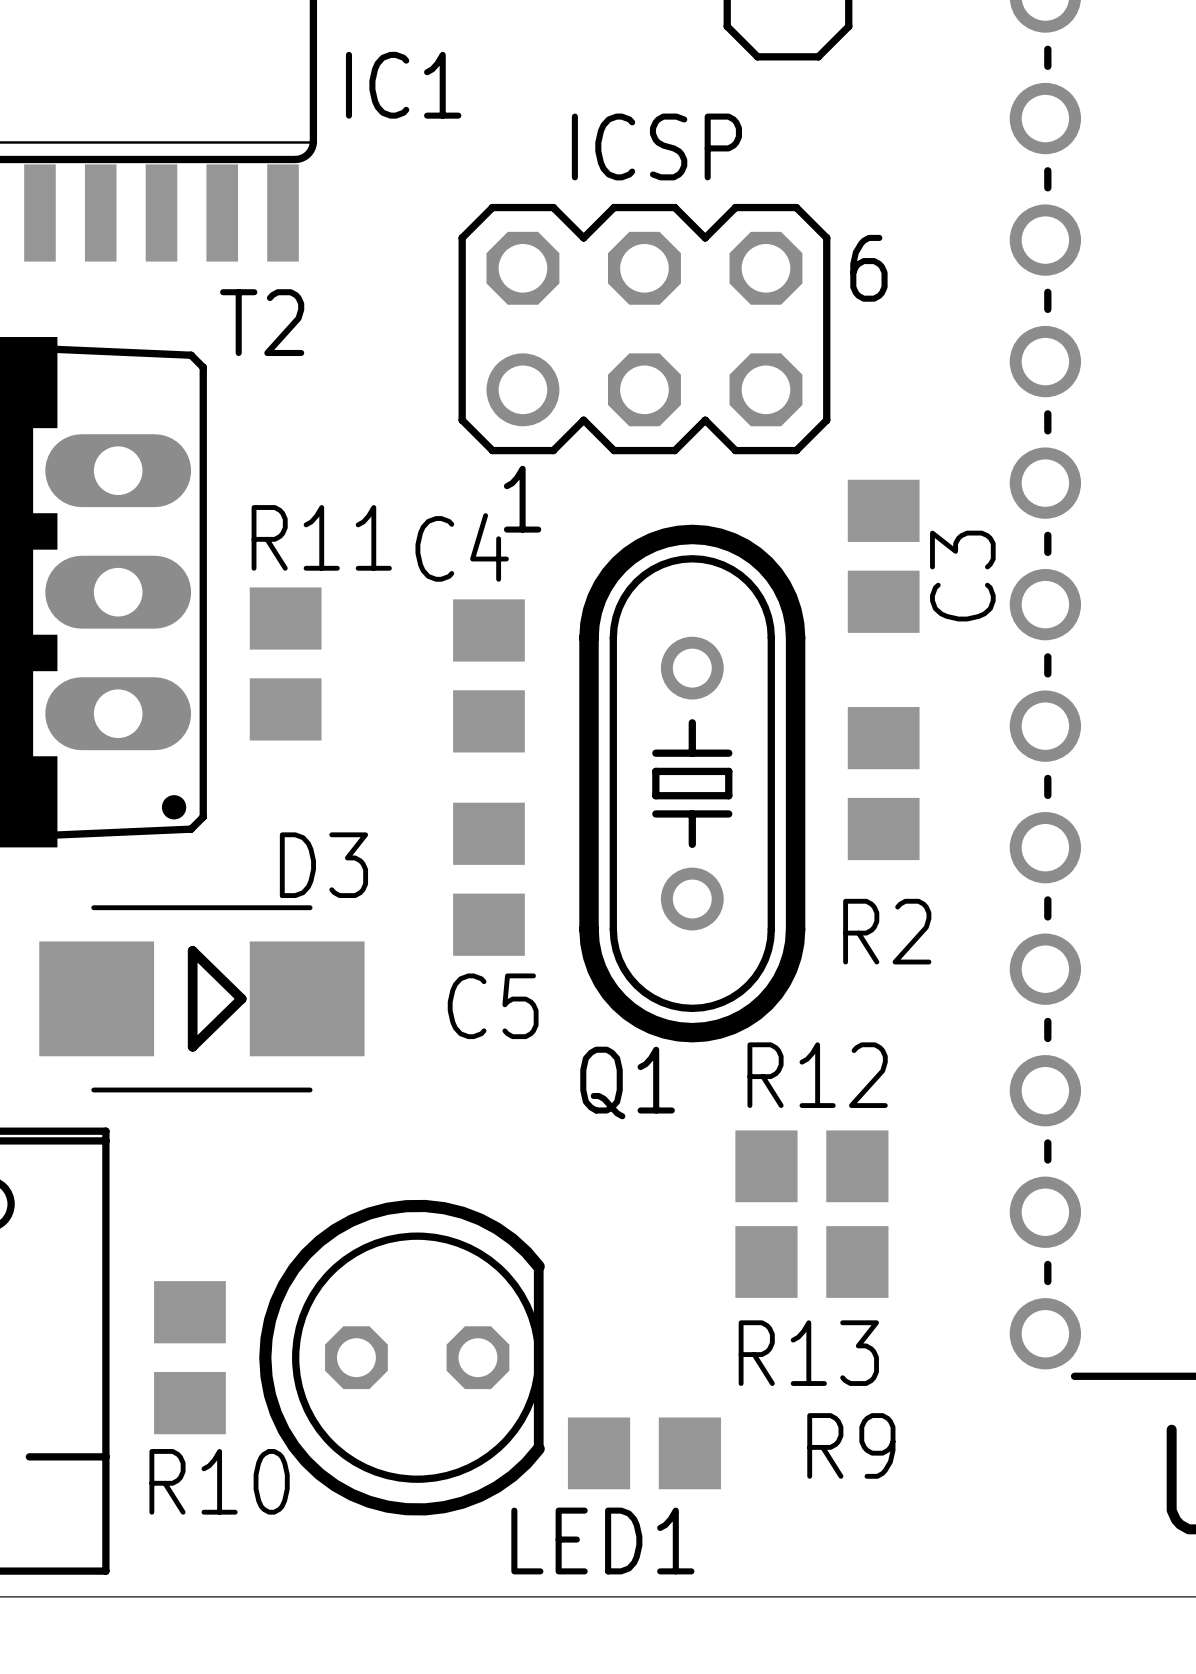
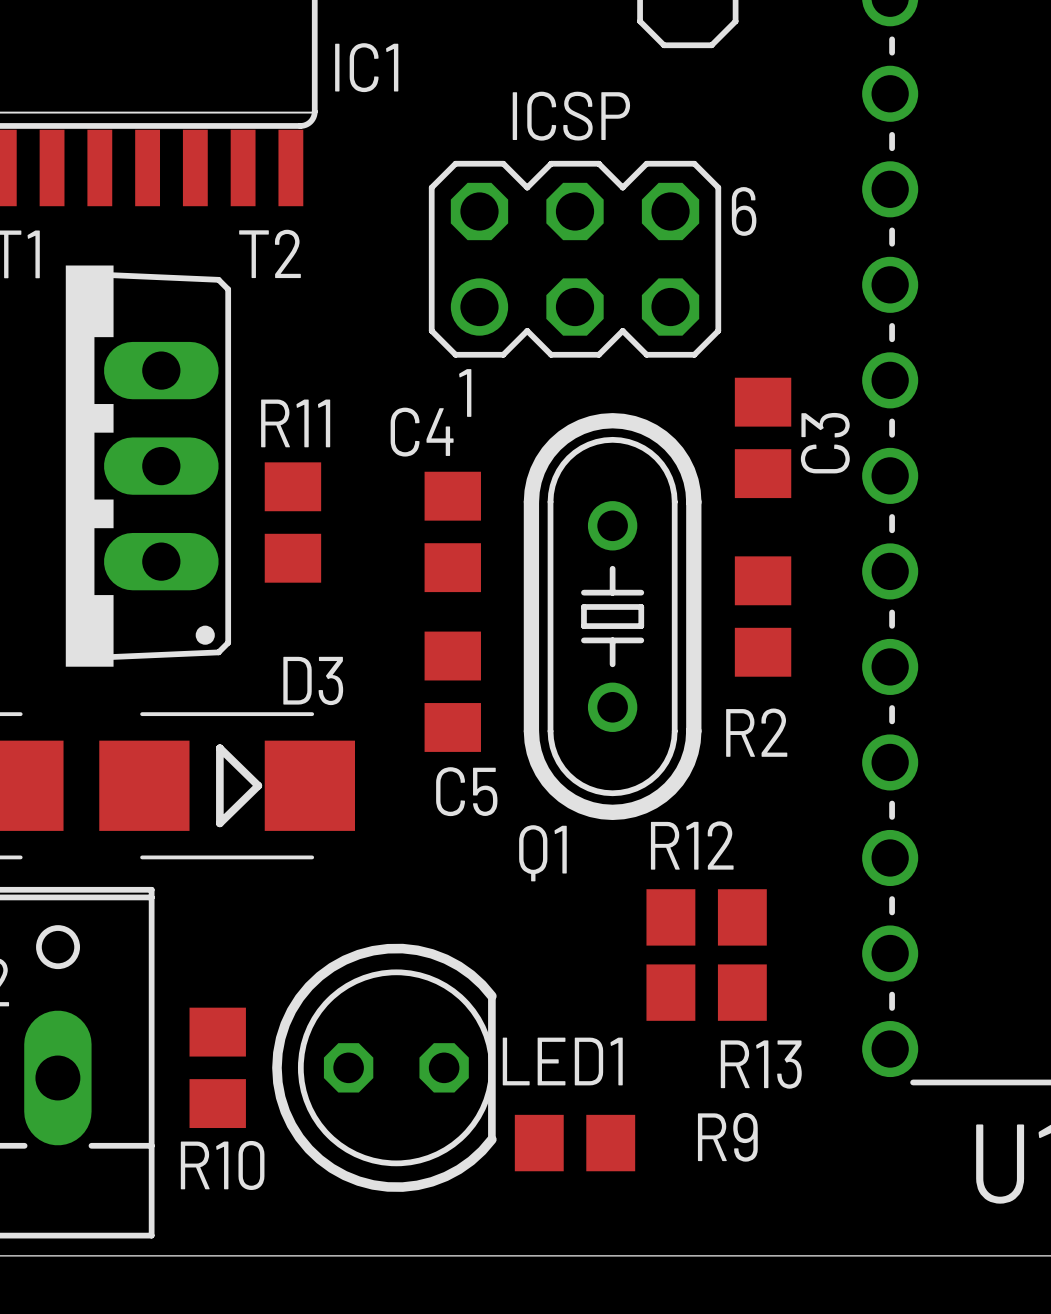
R13 name position: R13 (808, 1353) -> R13 (761, 1064)
LED1 name position: LED1 (602, 1540) -> LED1 (562, 1061)

